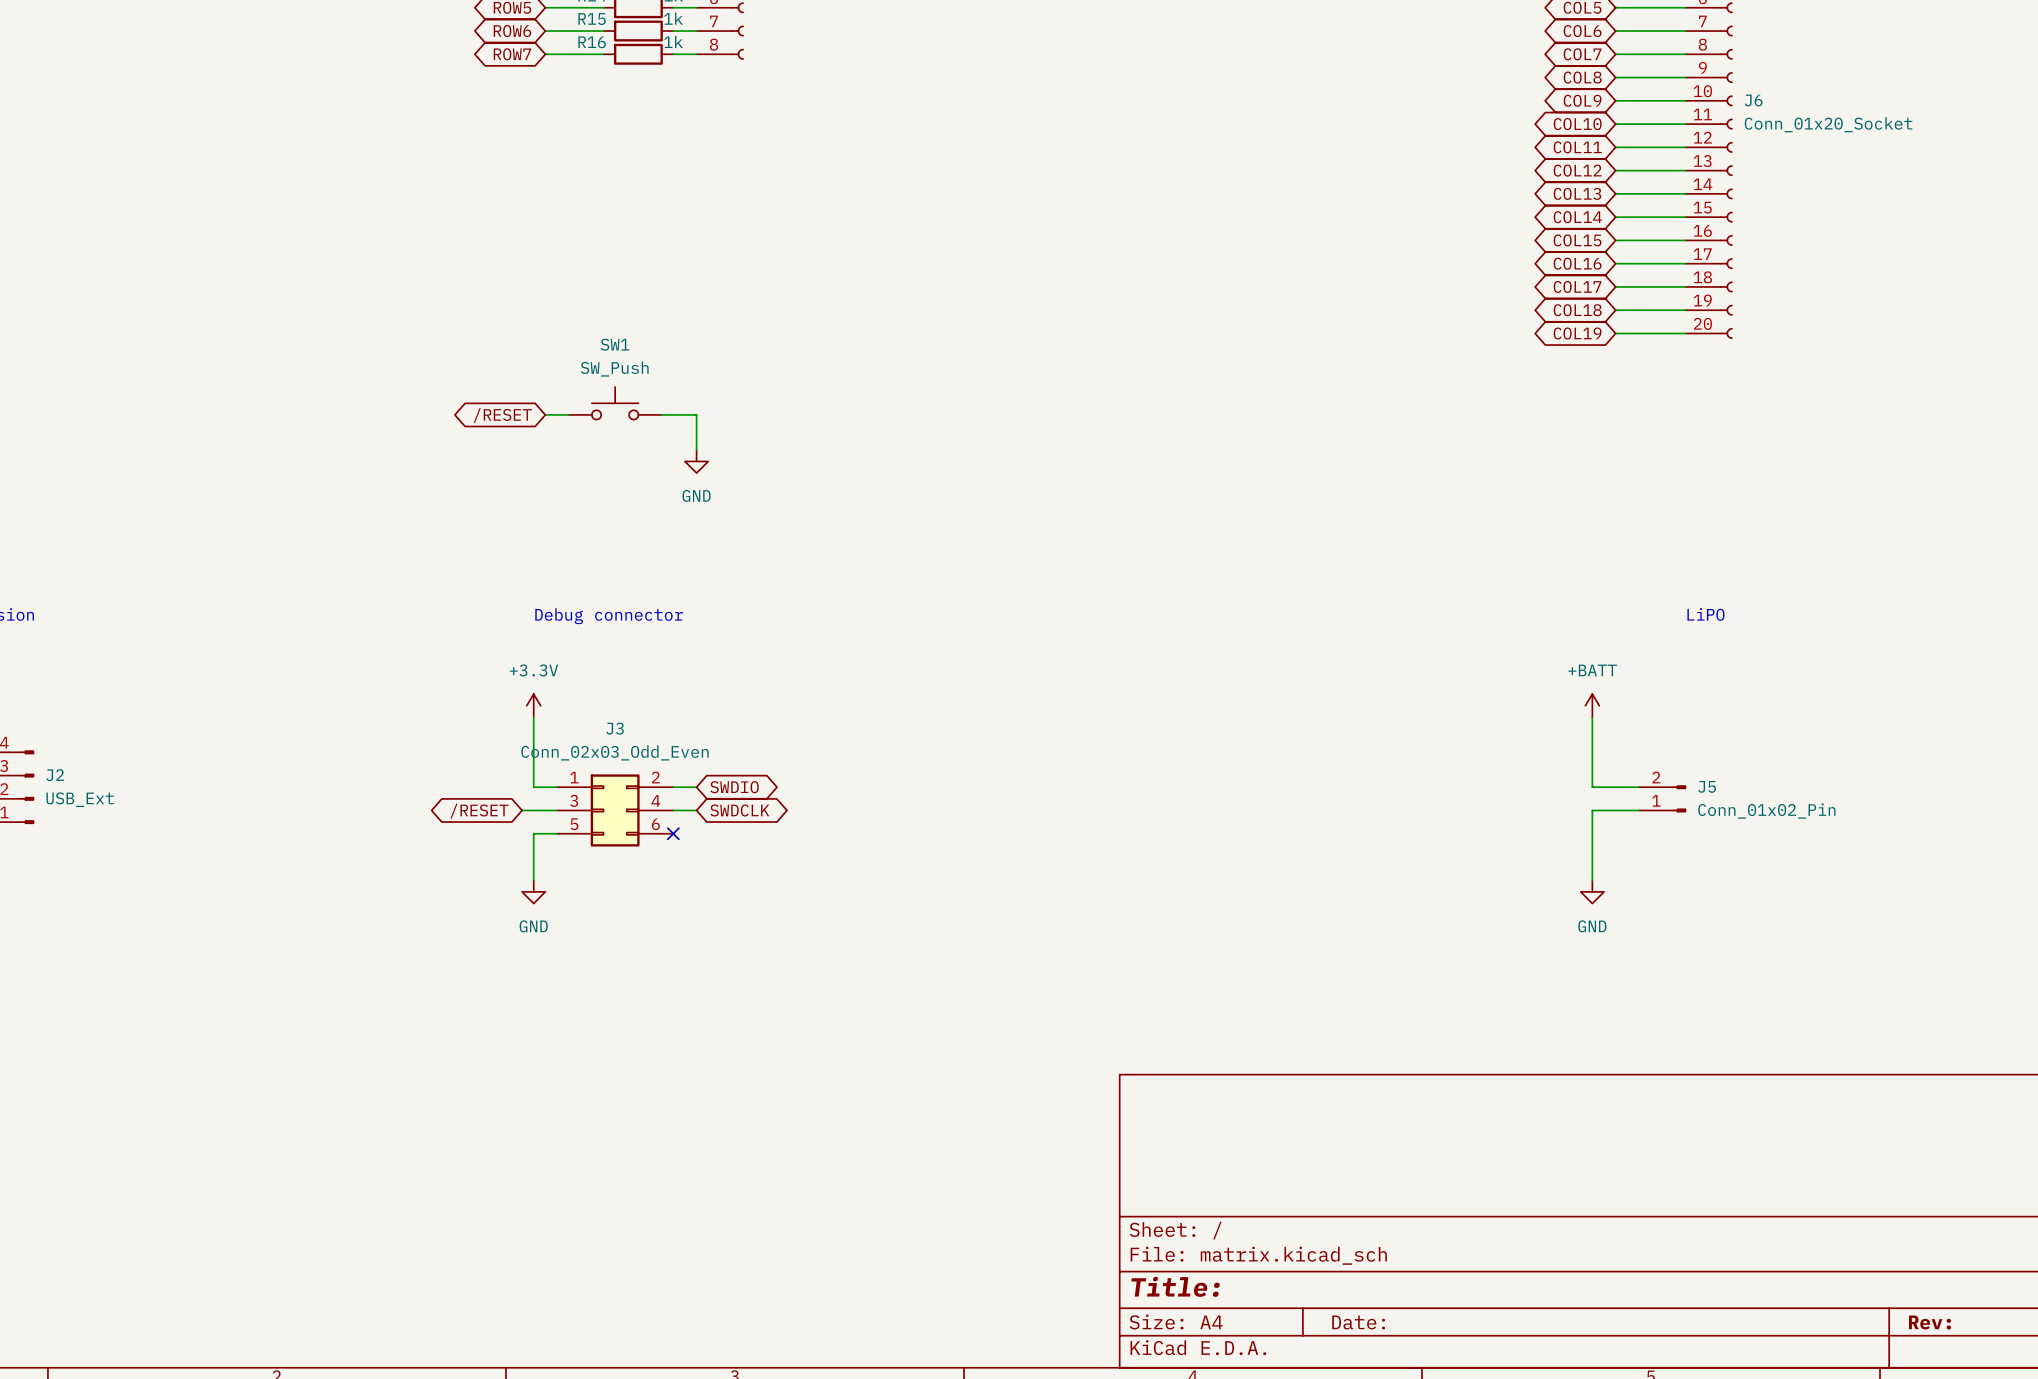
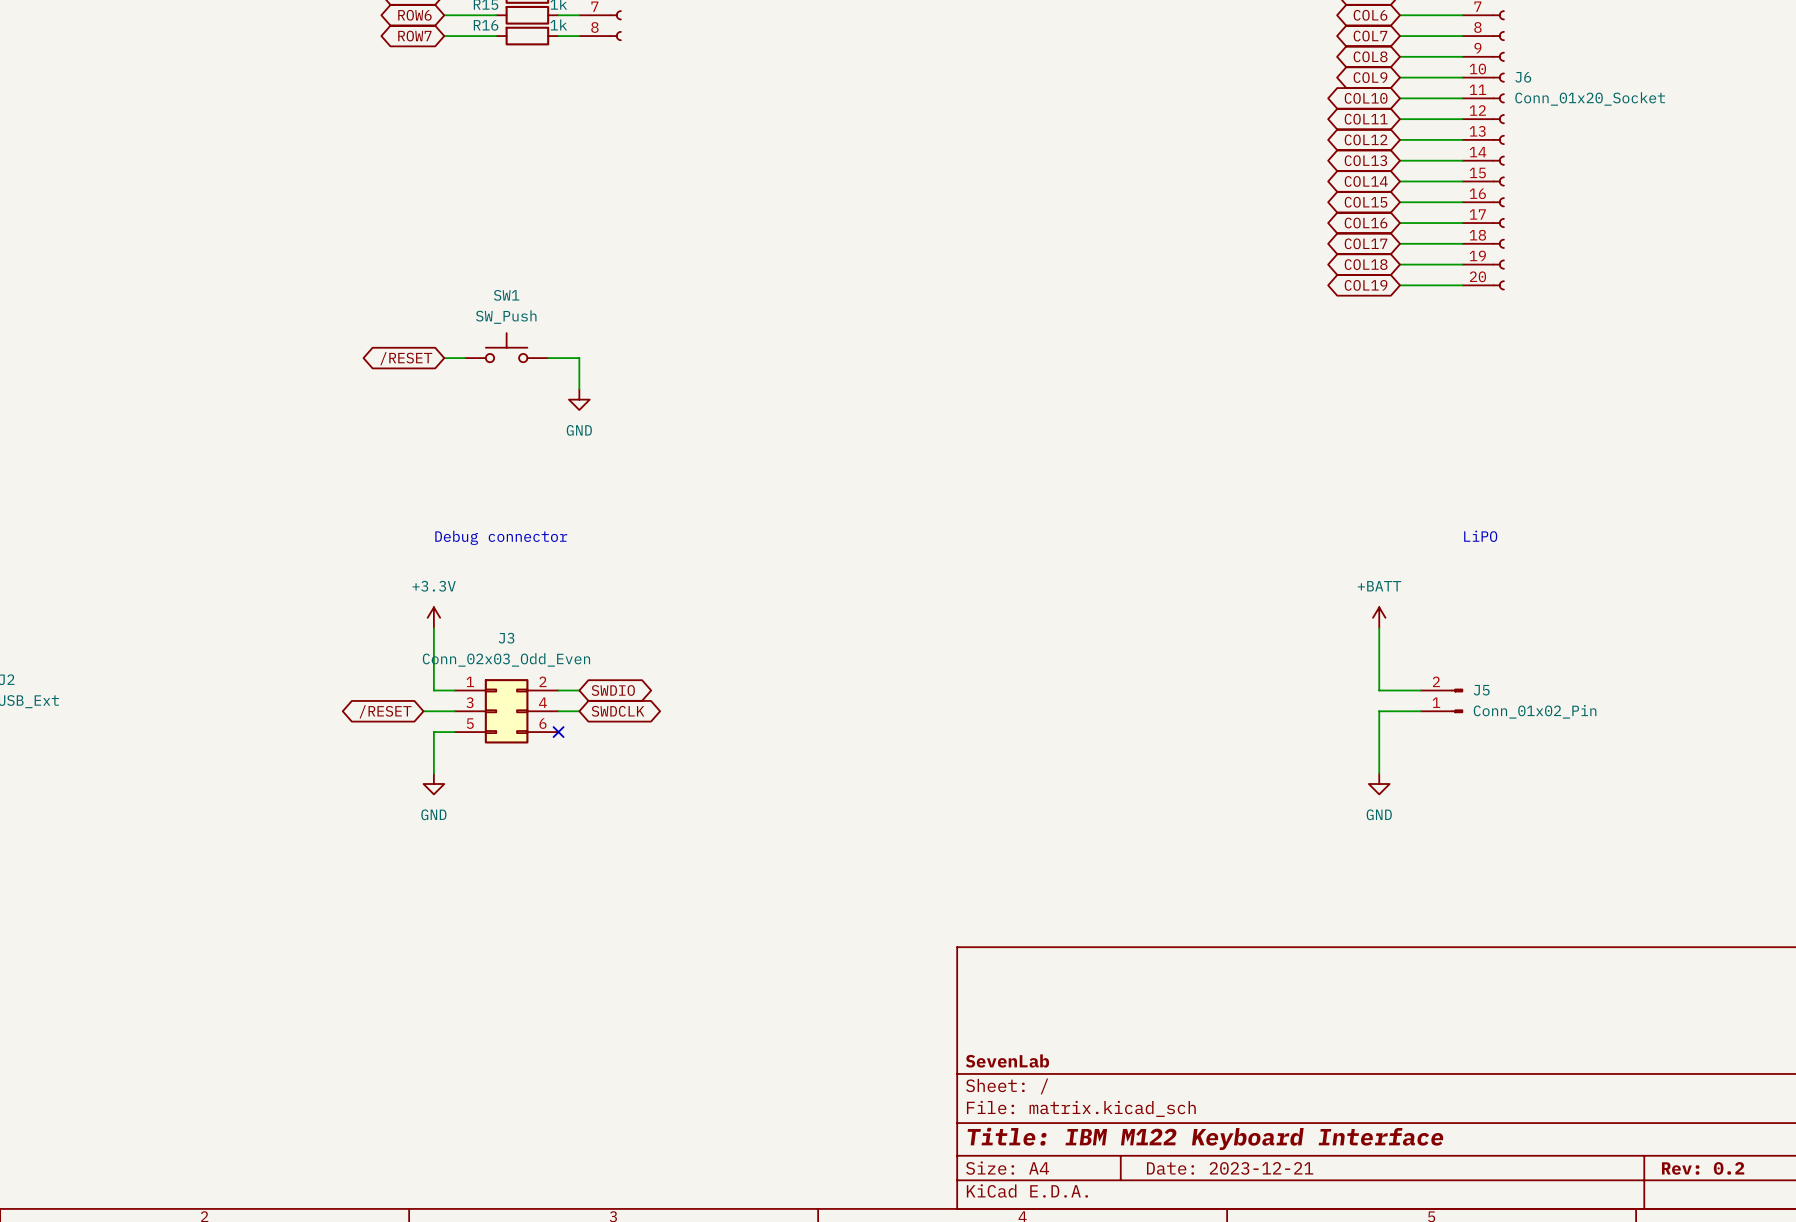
title block: none -> SevenLab (1007, 1060)
title block: Title: (1175, 1286) -> Title: IBM M122 Keyboard Interface (1205, 1138)
title block: Date: (1358, 1322) -> Date: 2023-12-21 (1230, 1168)
title block: Rev: (1929, 1322) -> Rev: 0.2 (1703, 1168)

